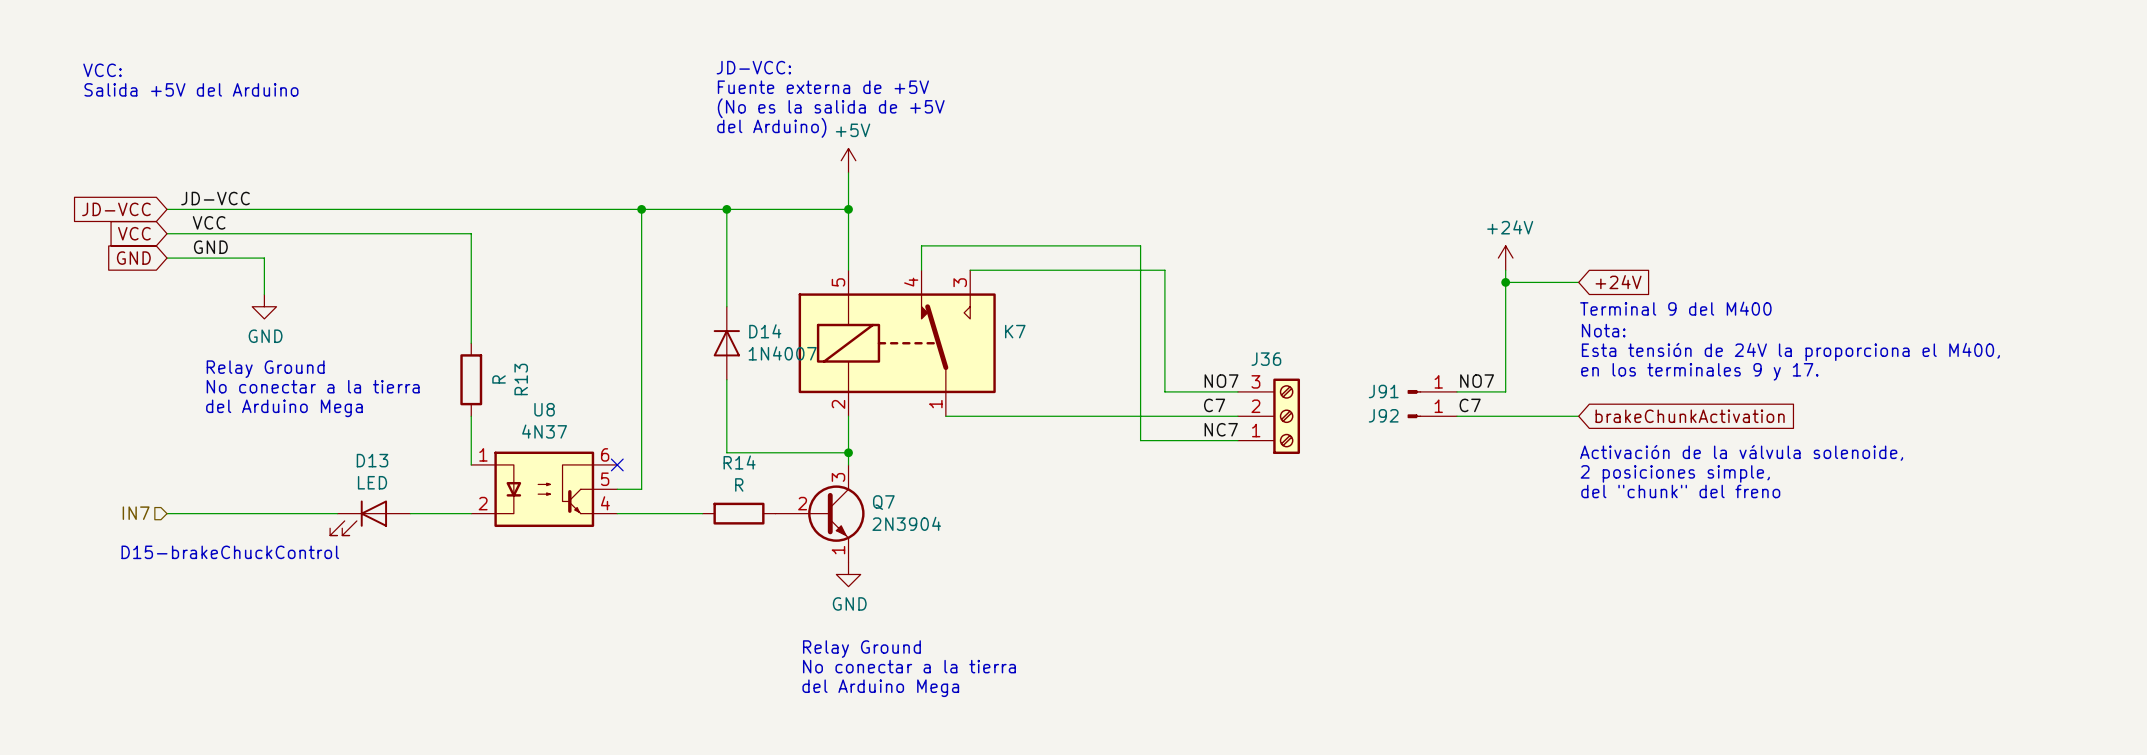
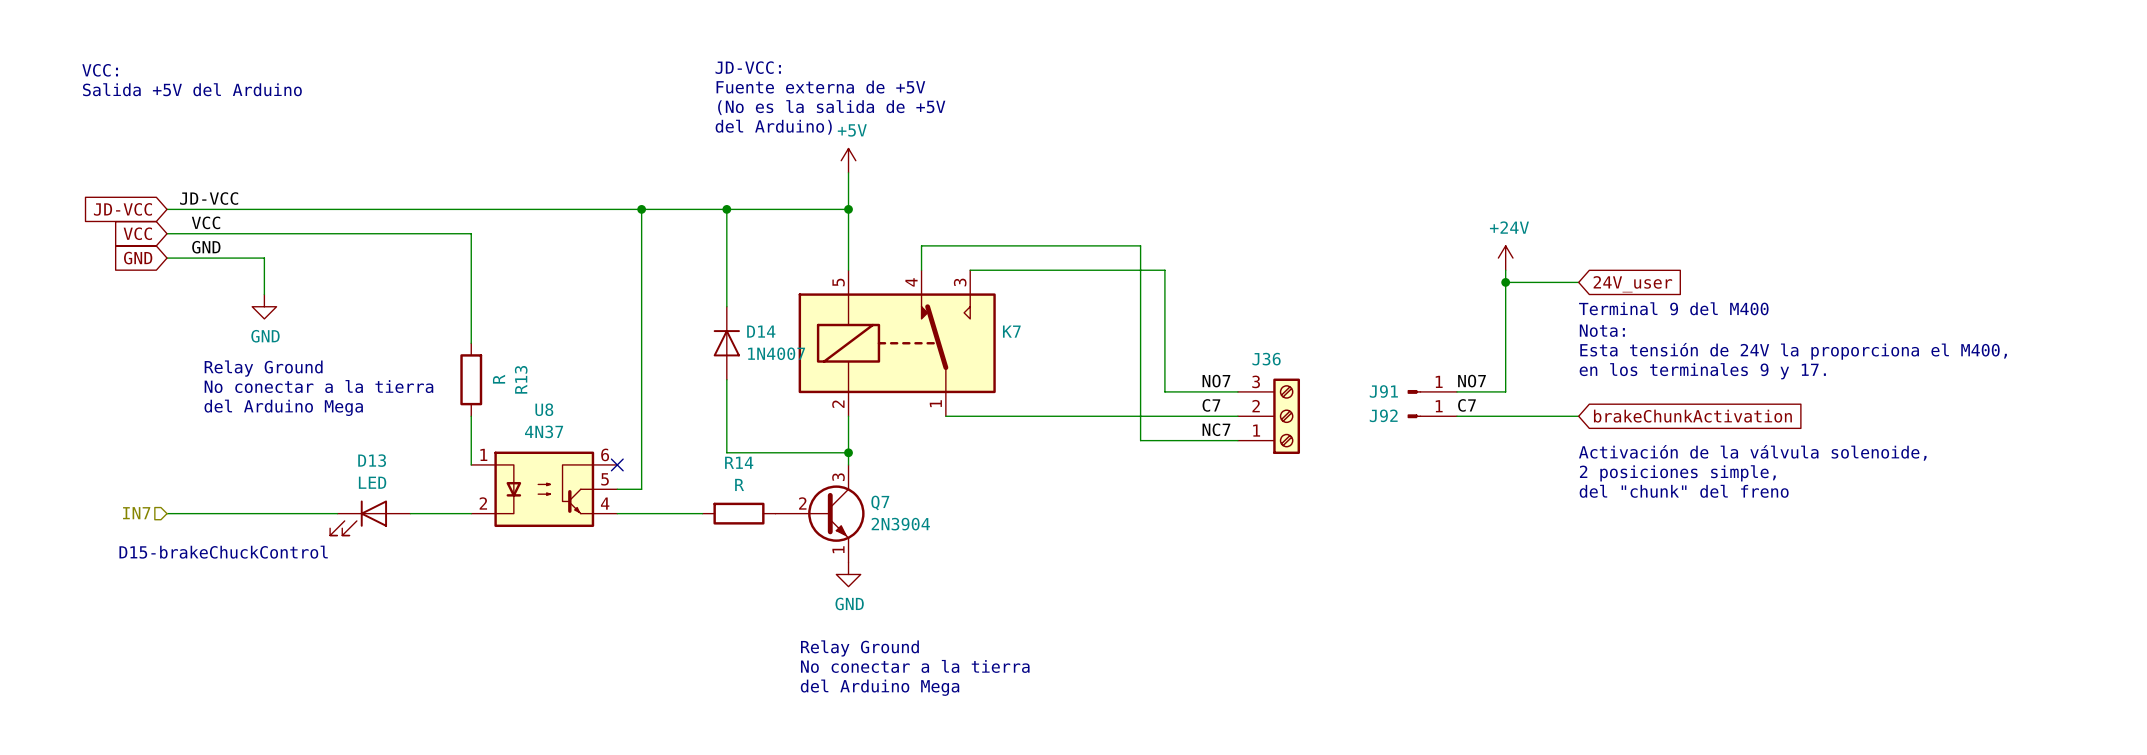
global label: +24V (1618, 282) -> 24V_user (1632, 284)

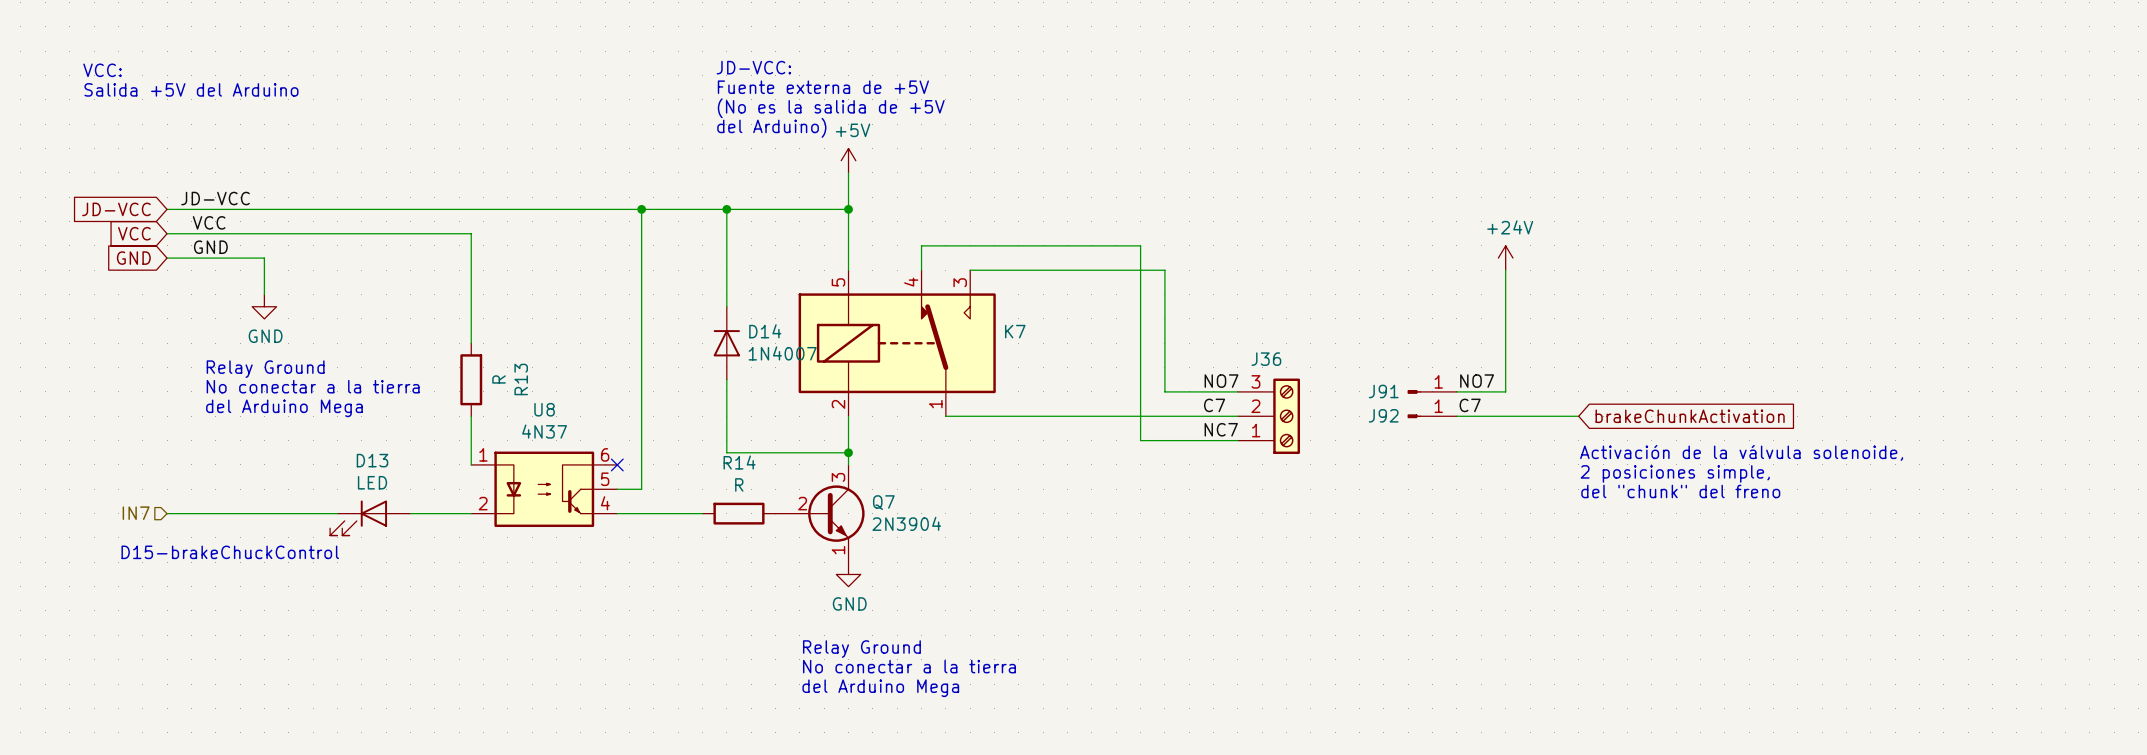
wire: (1505, 282) (1578, 282) -> none
junction: (1505, 282) -> none
global label: 24V_user (1632, 284) -> none
text: Terminal 9 del M400 (1673, 308) -> none
text: Nota: (1602, 330) -> none
text: Esta tensión de 24V la proporciona el M400, (1793, 351) -> none
text: en los terminales 9 y 17. (1702, 371) -> none

